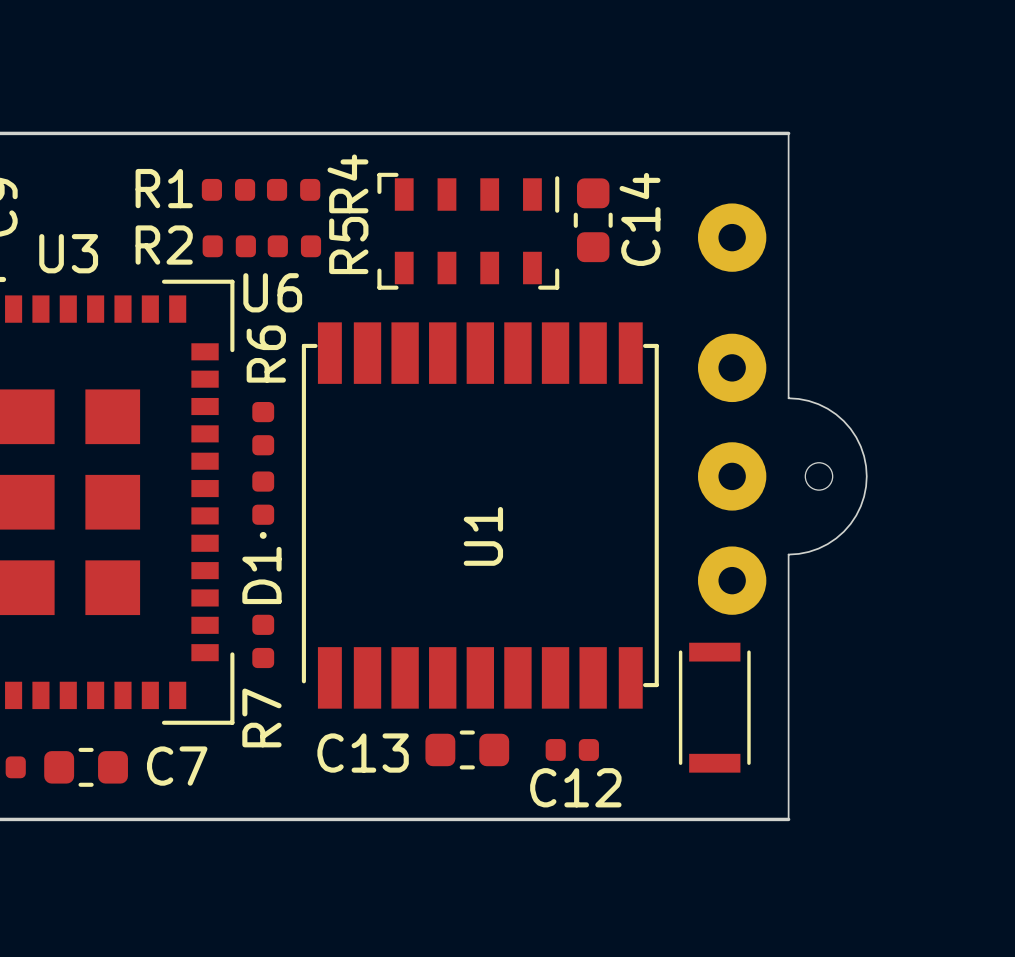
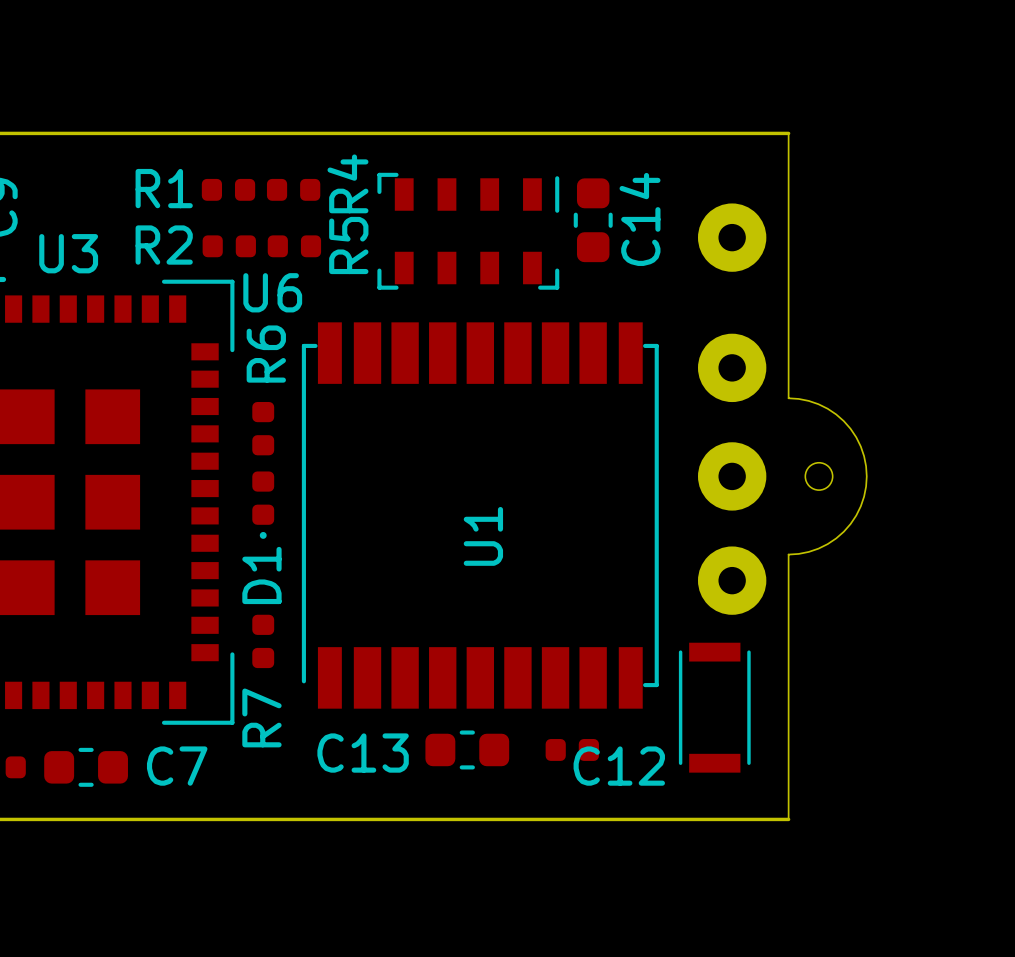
C12 name position: C12 (575, 787) -> C12 (619, 766)

